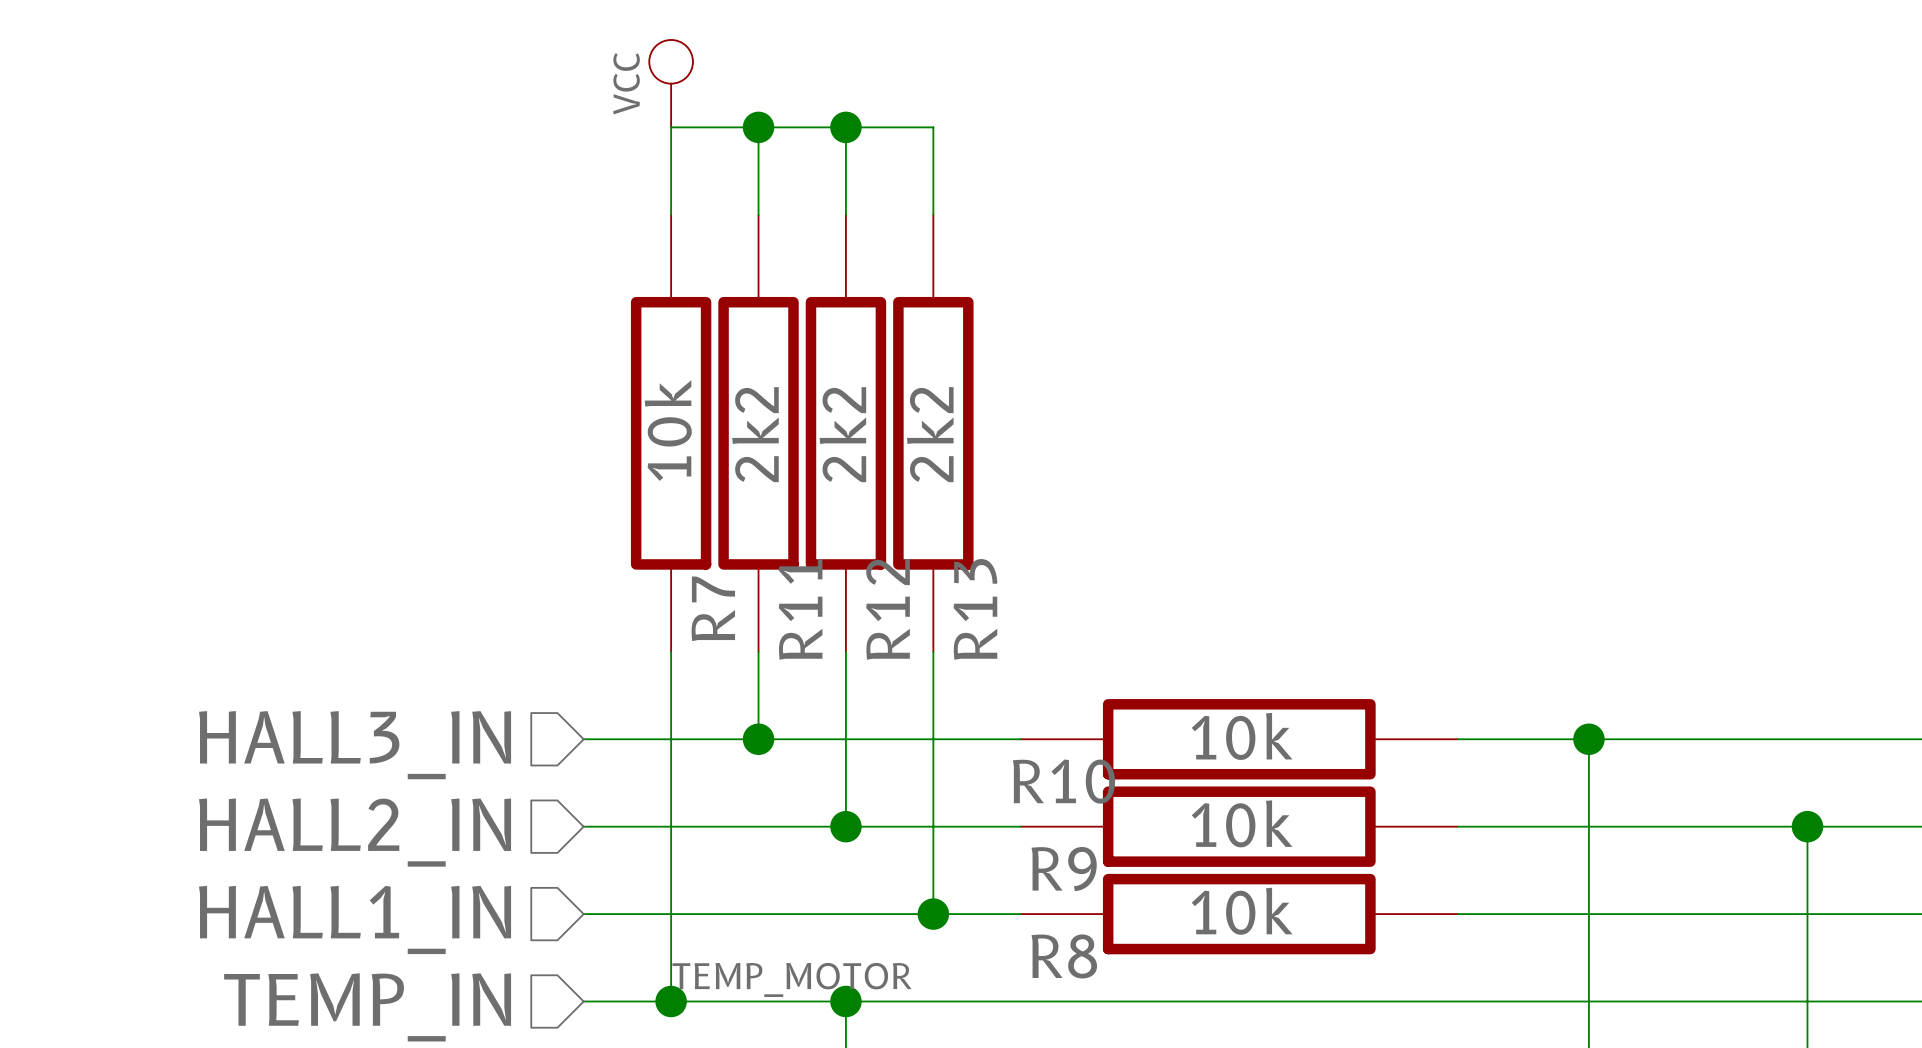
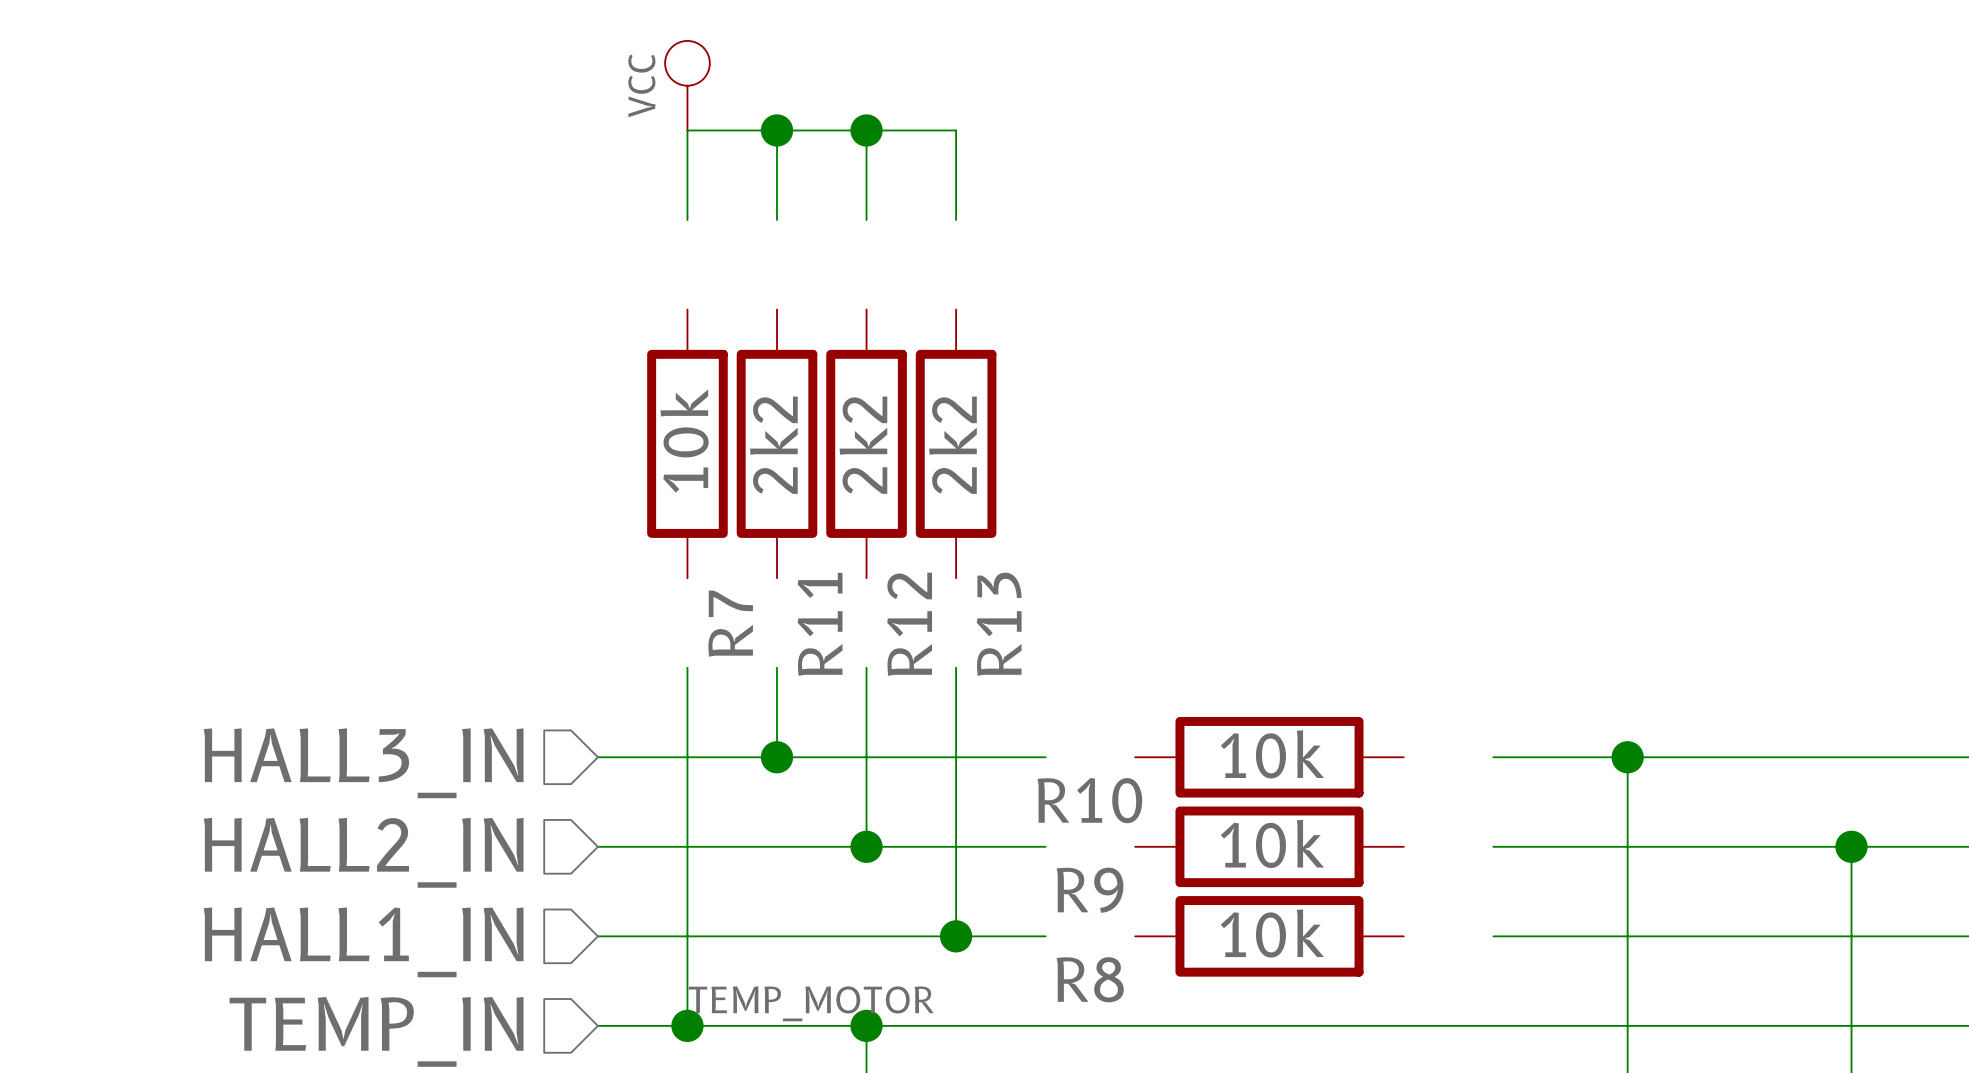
R7 symbol: [630, 214, 712, 652] -> [647, 309, 728, 579]
R11 symbol: [718, 214, 799, 652] -> [736, 309, 818, 579]
R12 symbol: [805, 214, 887, 652] -> [826, 309, 907, 579]
R13 symbol: [893, 214, 974, 652] -> [915, 309, 997, 579]
R10 symbol: [1020, 699, 1458, 780] -> [1135, 716, 1404, 798]
R9 symbol: [1020, 786, 1458, 867] -> [1135, 806, 1404, 888]
R8 symbol: [1020, 873, 1458, 955] -> [1135, 896, 1404, 977]

